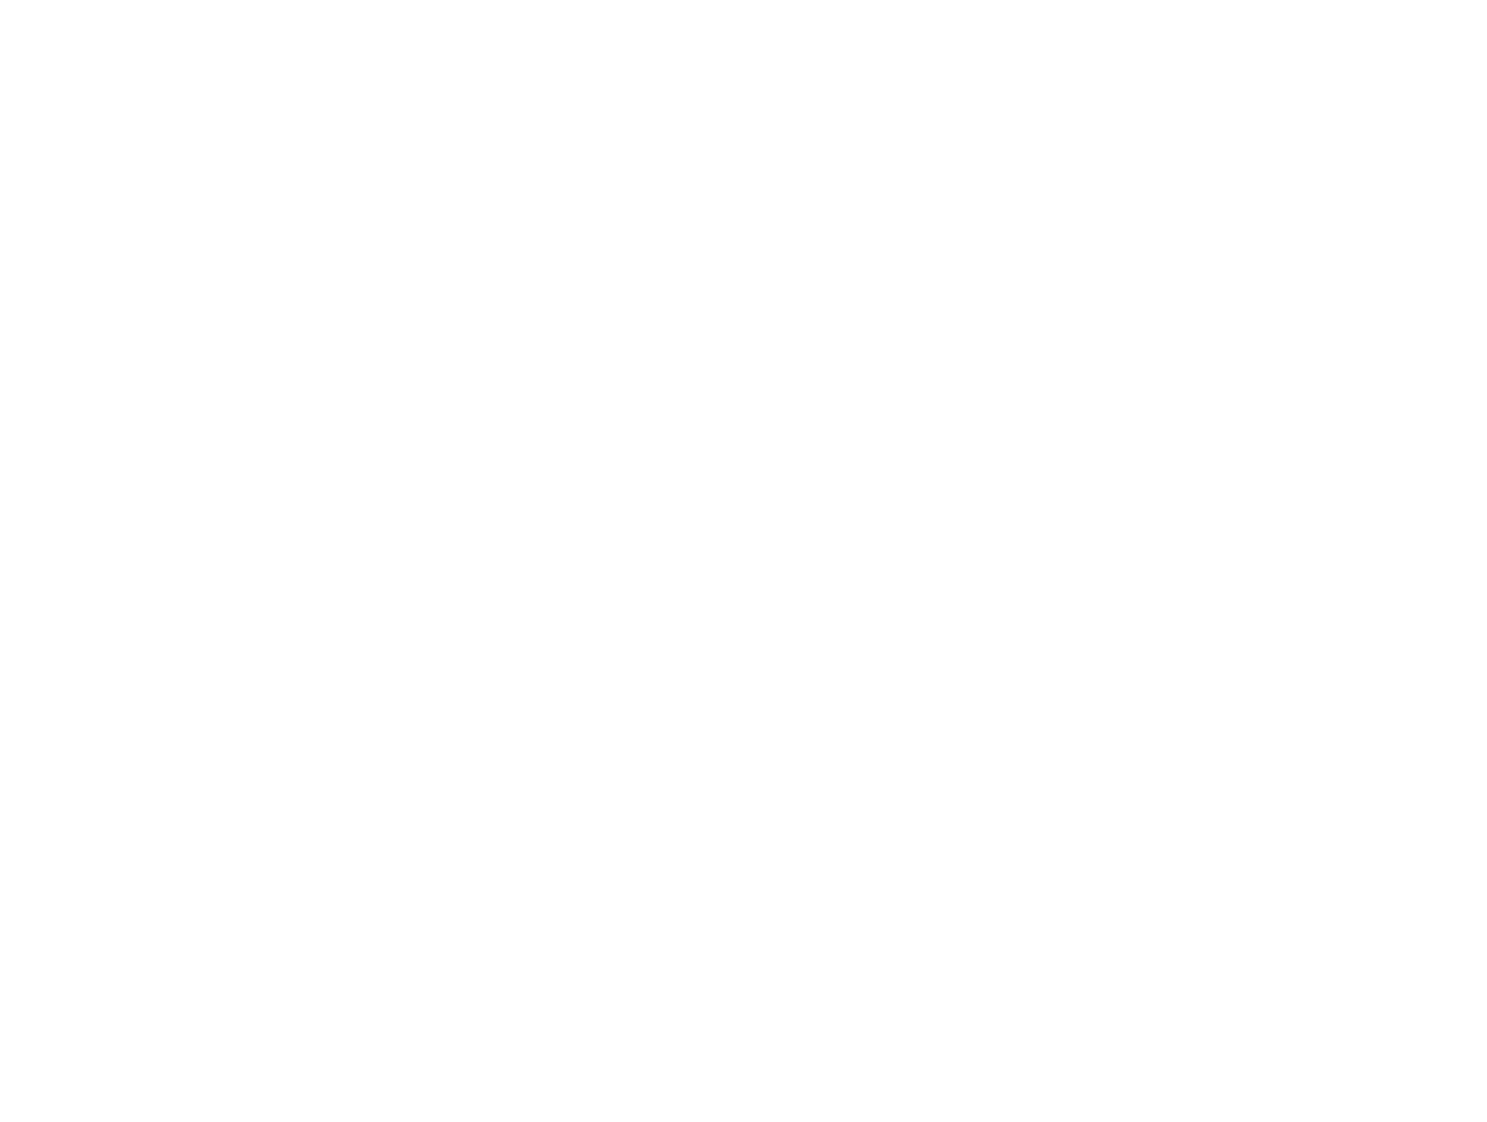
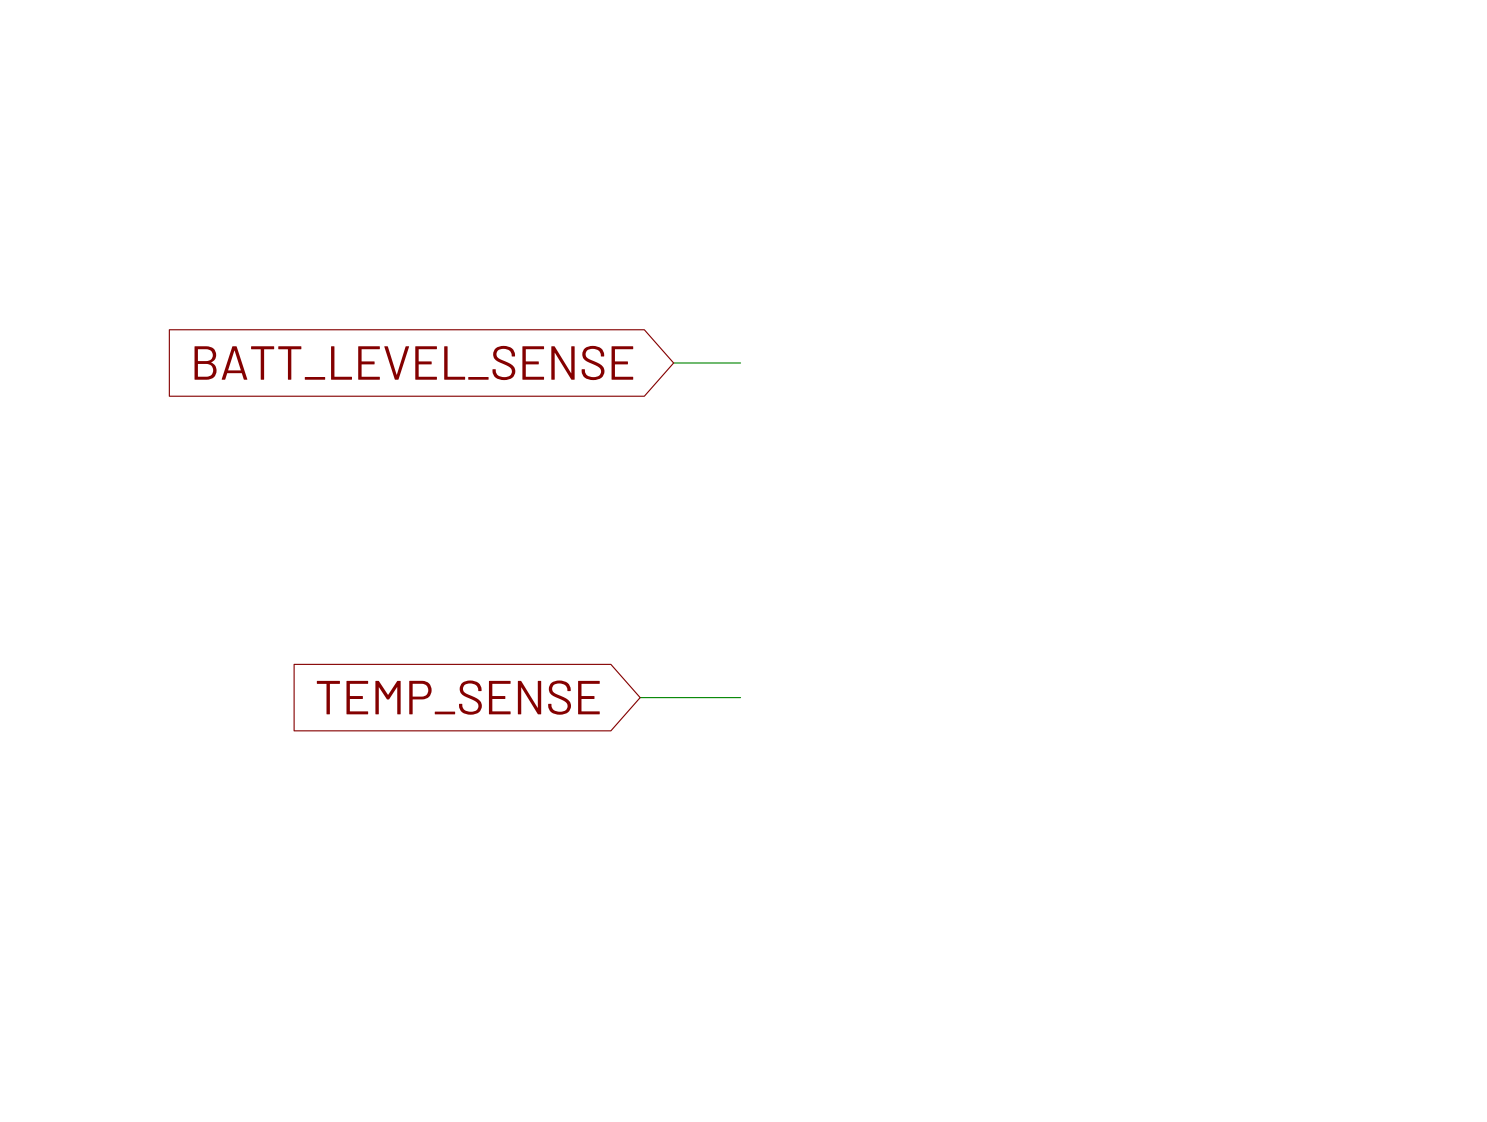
global label: none -> BATT_LEVEL_SENSE (413, 362)
wire: none -> (673, 362) (740, 362)
global label: none -> TEMP_SENSE (458, 697)
wire: none -> (640, 697) (740, 697)

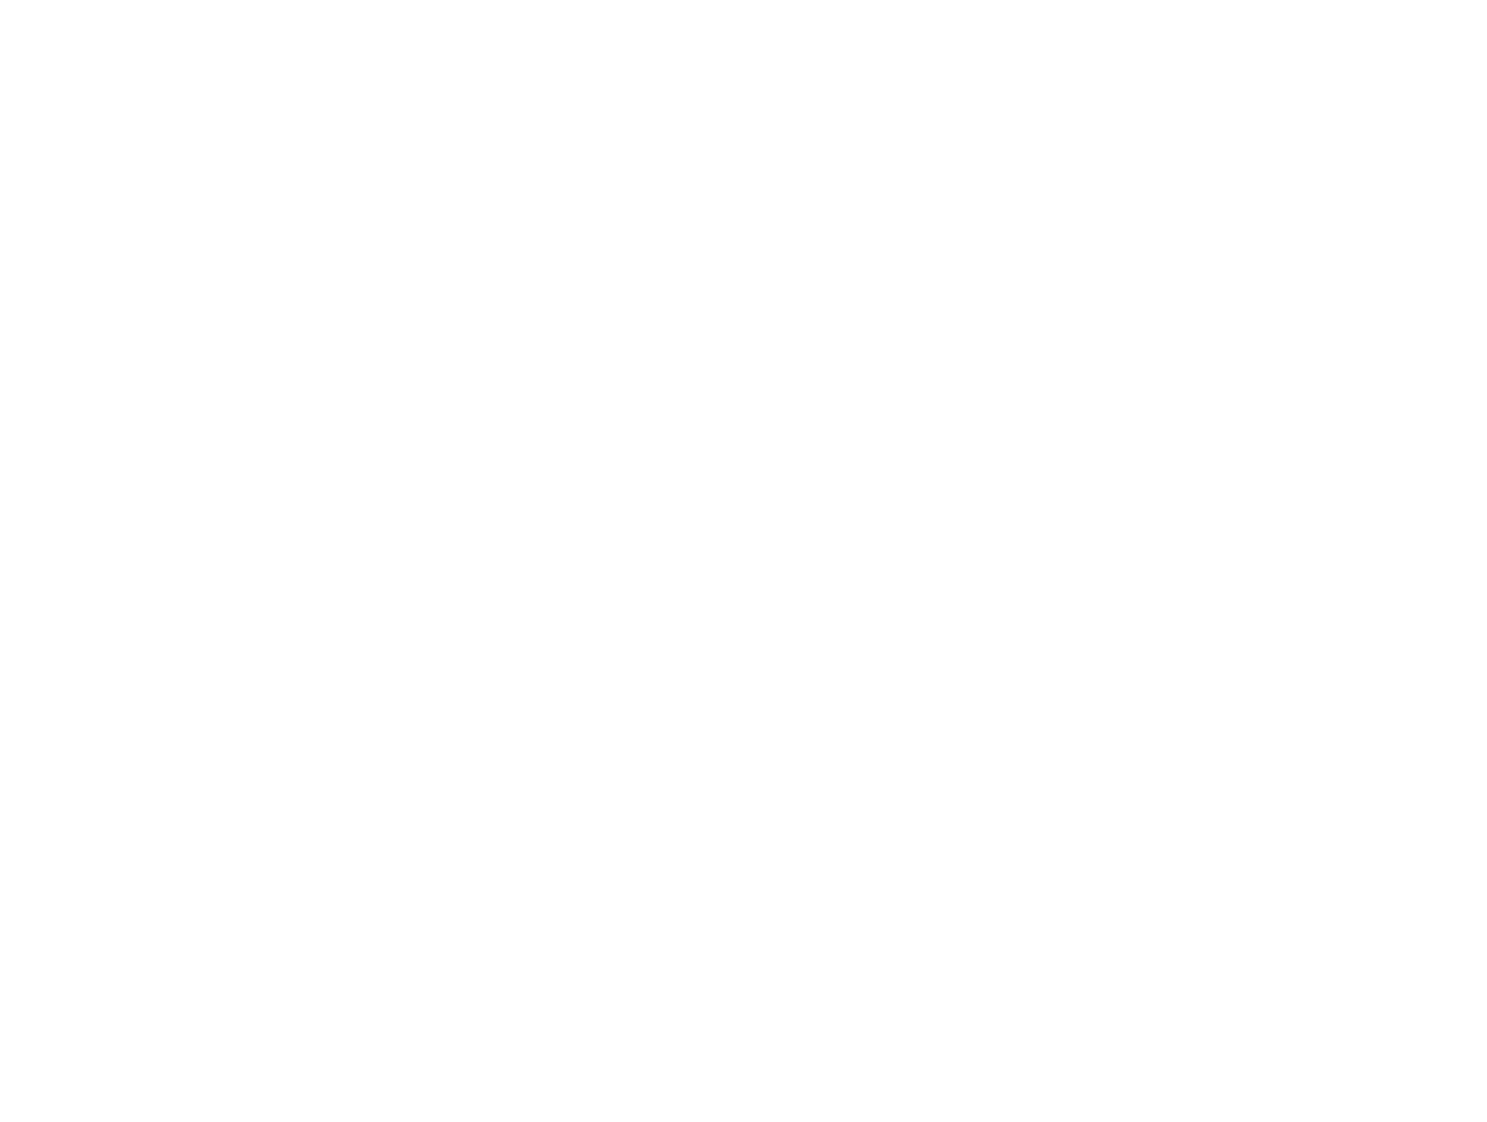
global label: BATT_LEVEL_SENSE (413, 362) -> none
wire: (673, 362) (740, 362) -> none
global label: TEMP_SENSE (458, 697) -> none
wire: (640, 697) (740, 697) -> none

